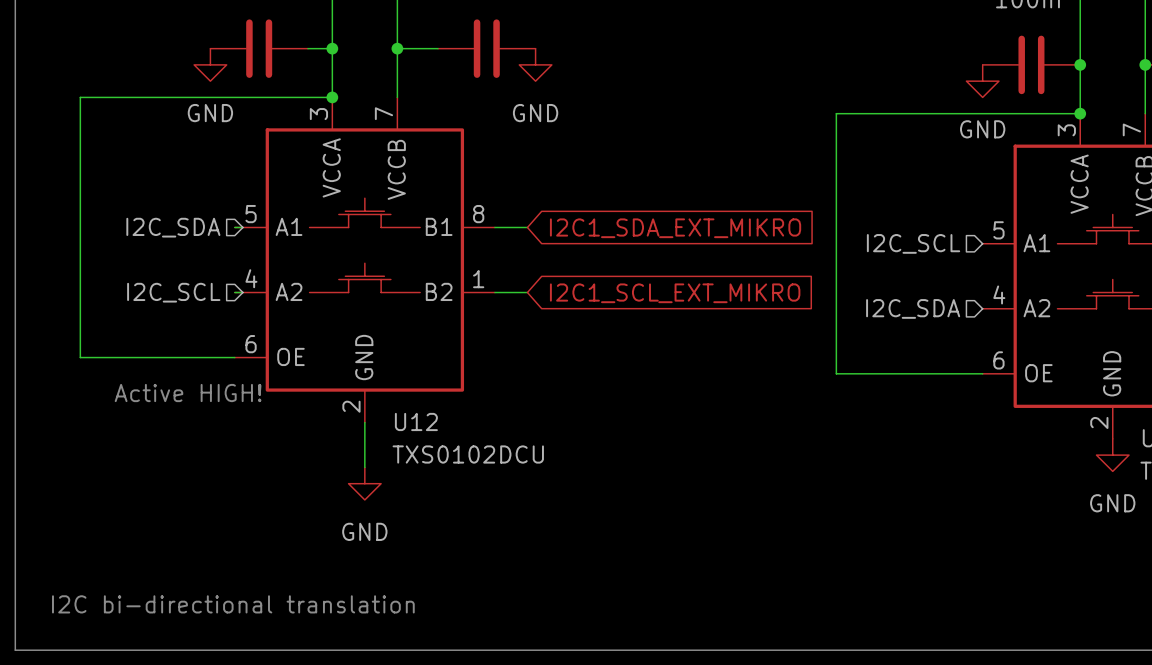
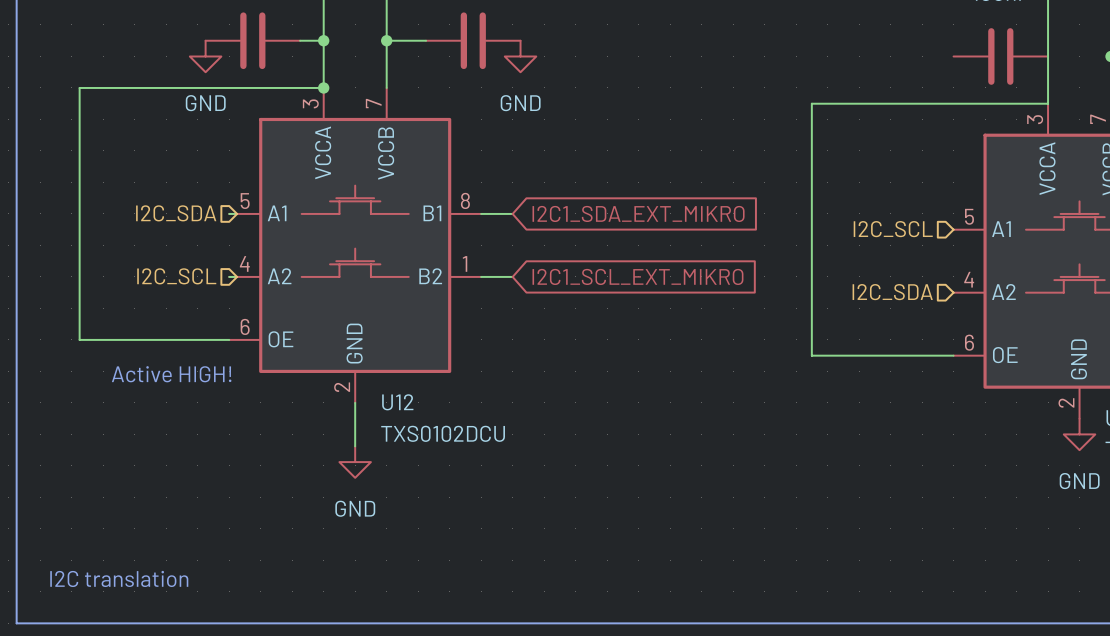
junction: (1080, 64) -> none
power symbol: GND (982, 81) -> none
junction: (1080, 113) -> none
text: I2C bi-directional translation (233, 604) -> I2C translation (119, 578)

